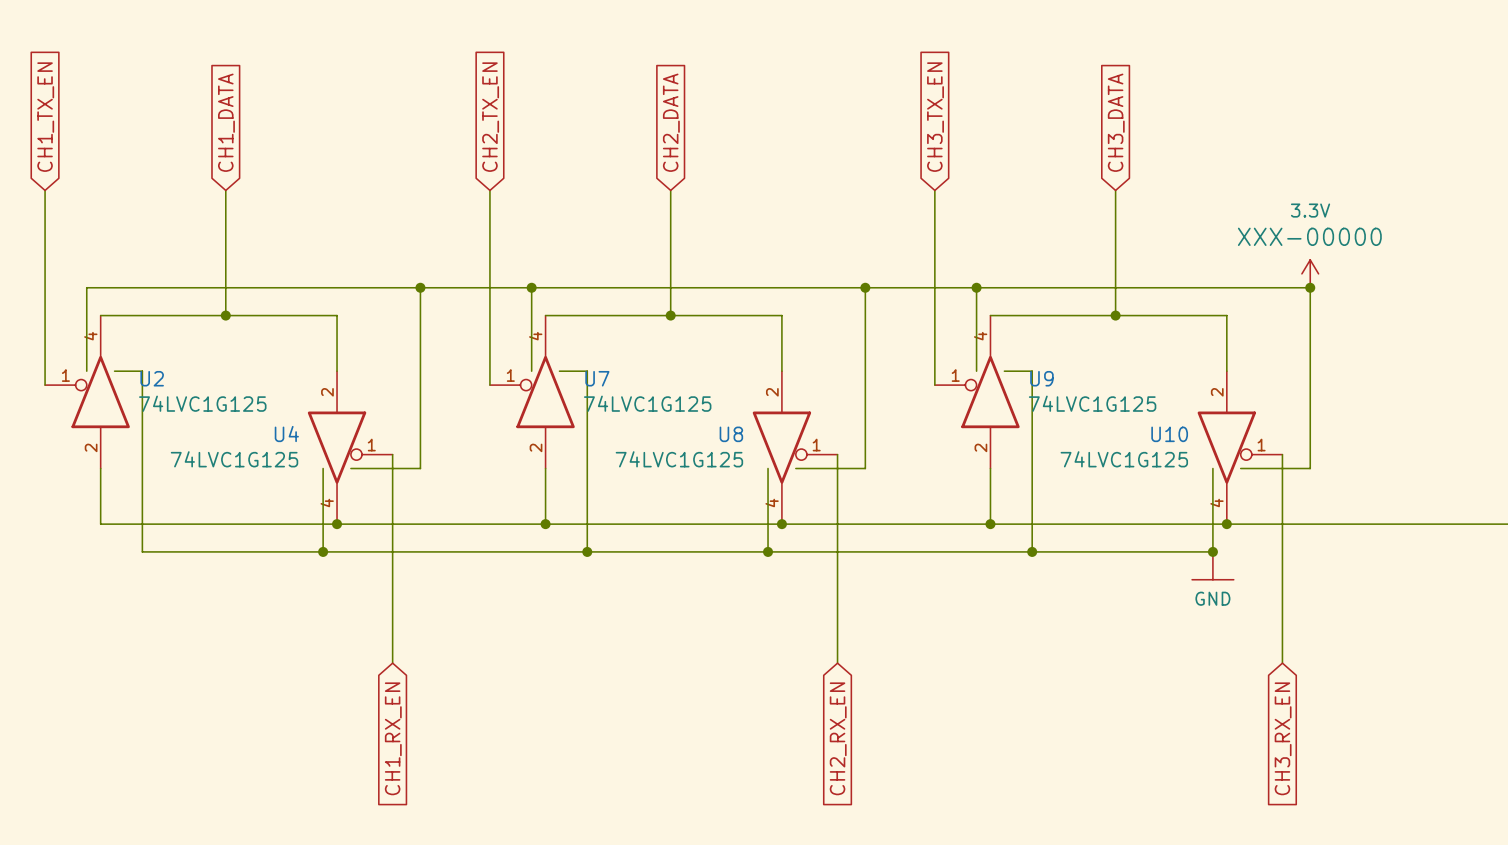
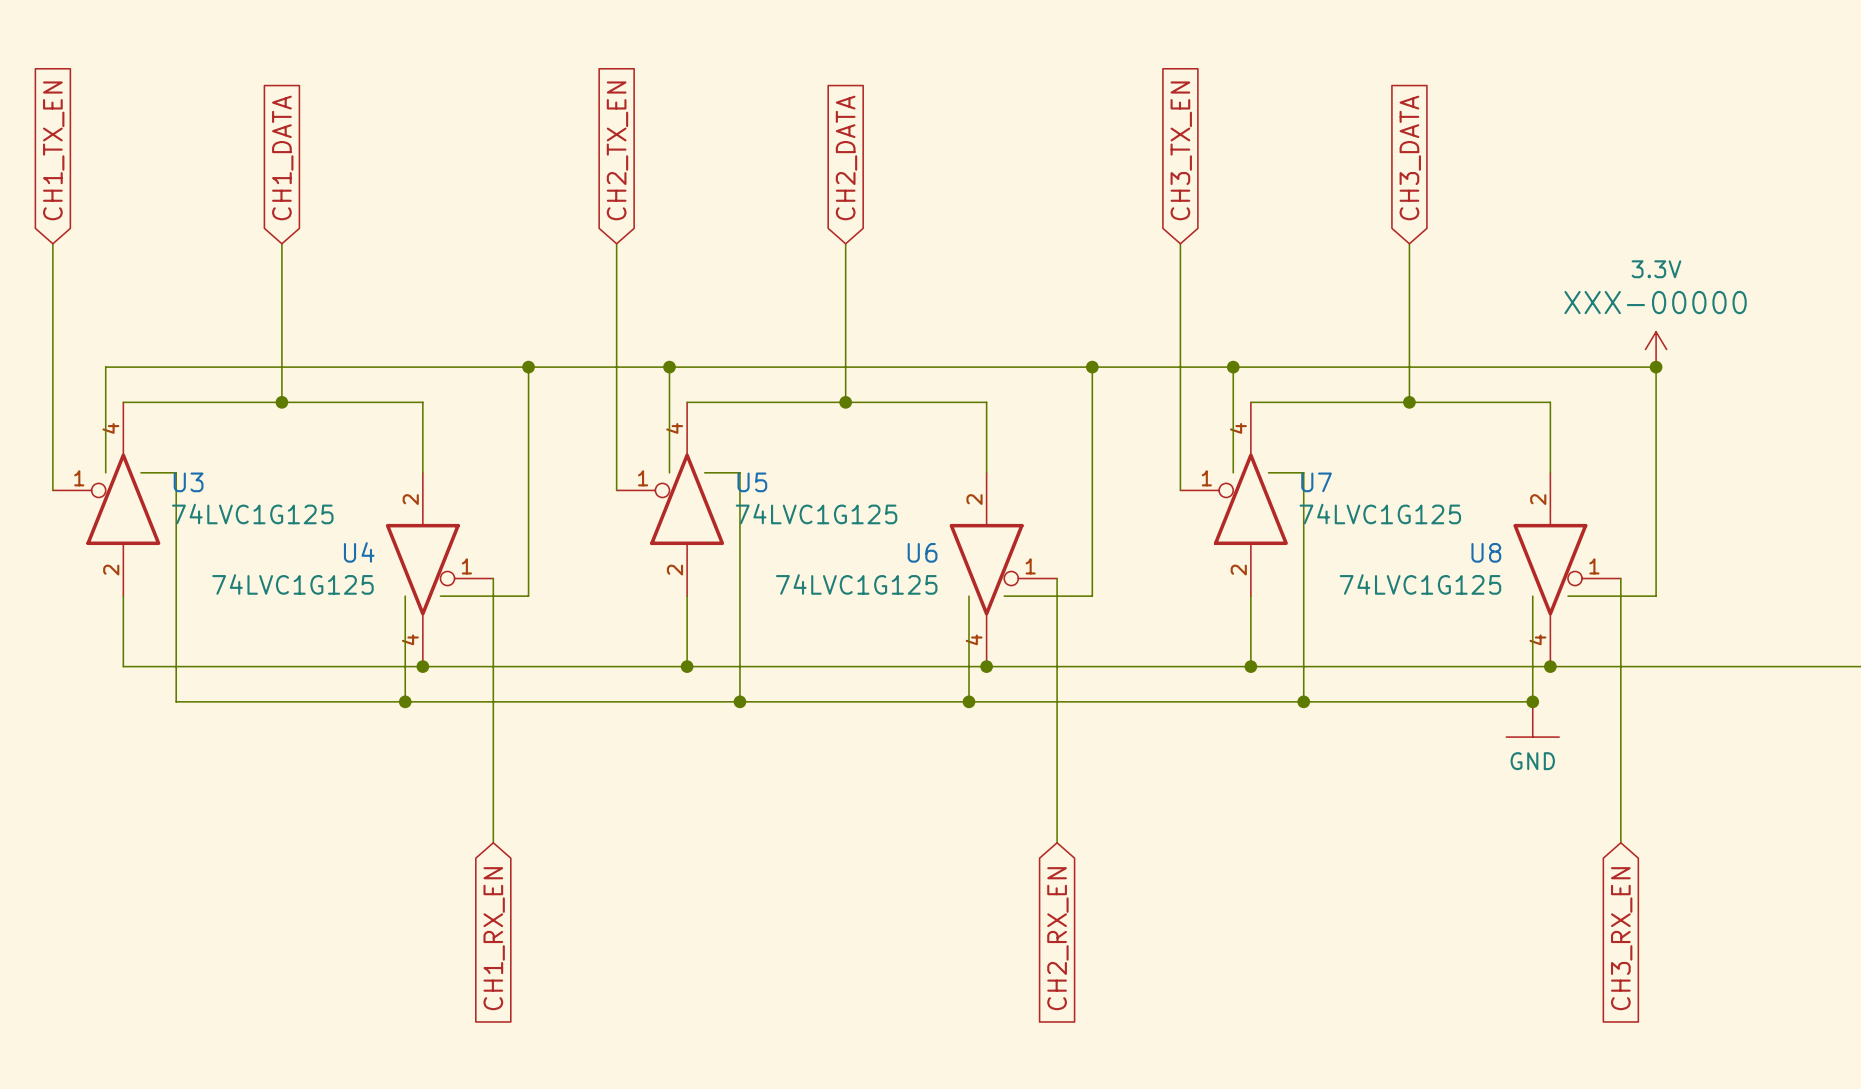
U2 name: U2 (152, 378) -> U3 (188, 482)
U7 name: U7 (597, 378) -> U5 (752, 482)
U9 name: U9 (1041, 378) -> U7 (1316, 482)
U8 name: U8 (731, 434) -> U6 (922, 552)
U10 name: U10 (1169, 434) -> U8 (1486, 552)

